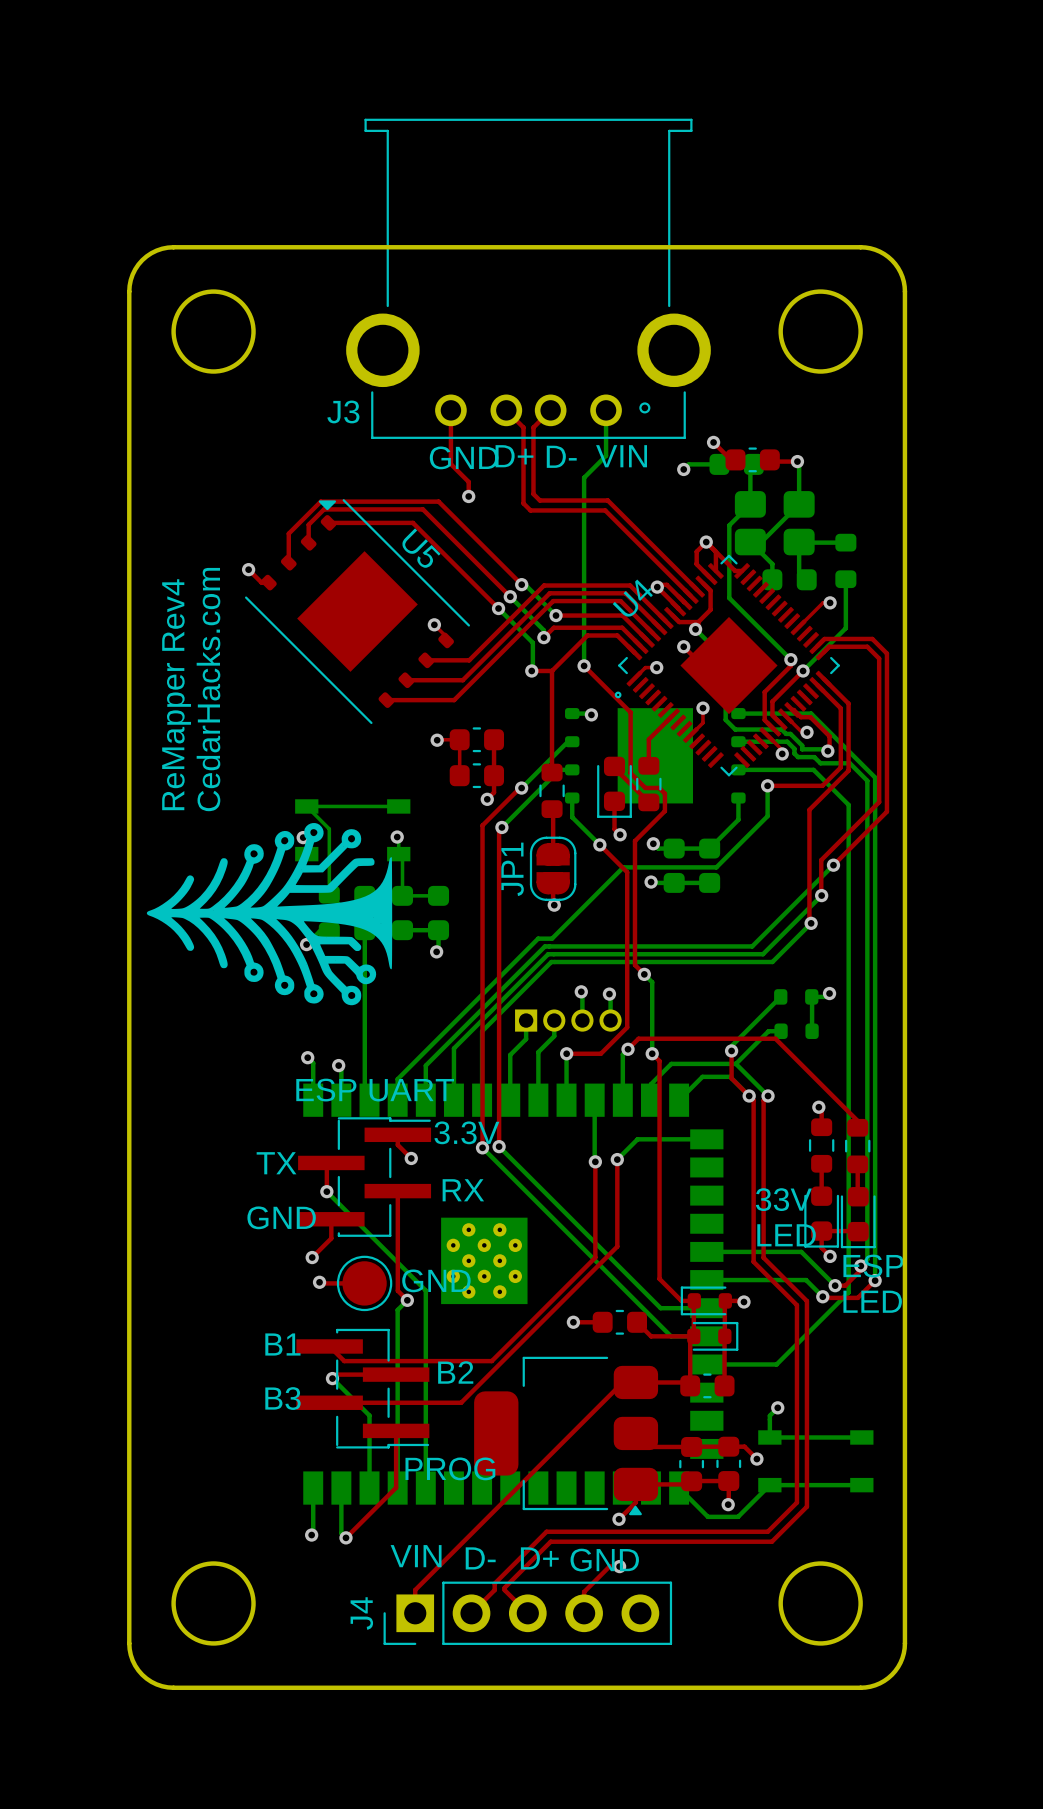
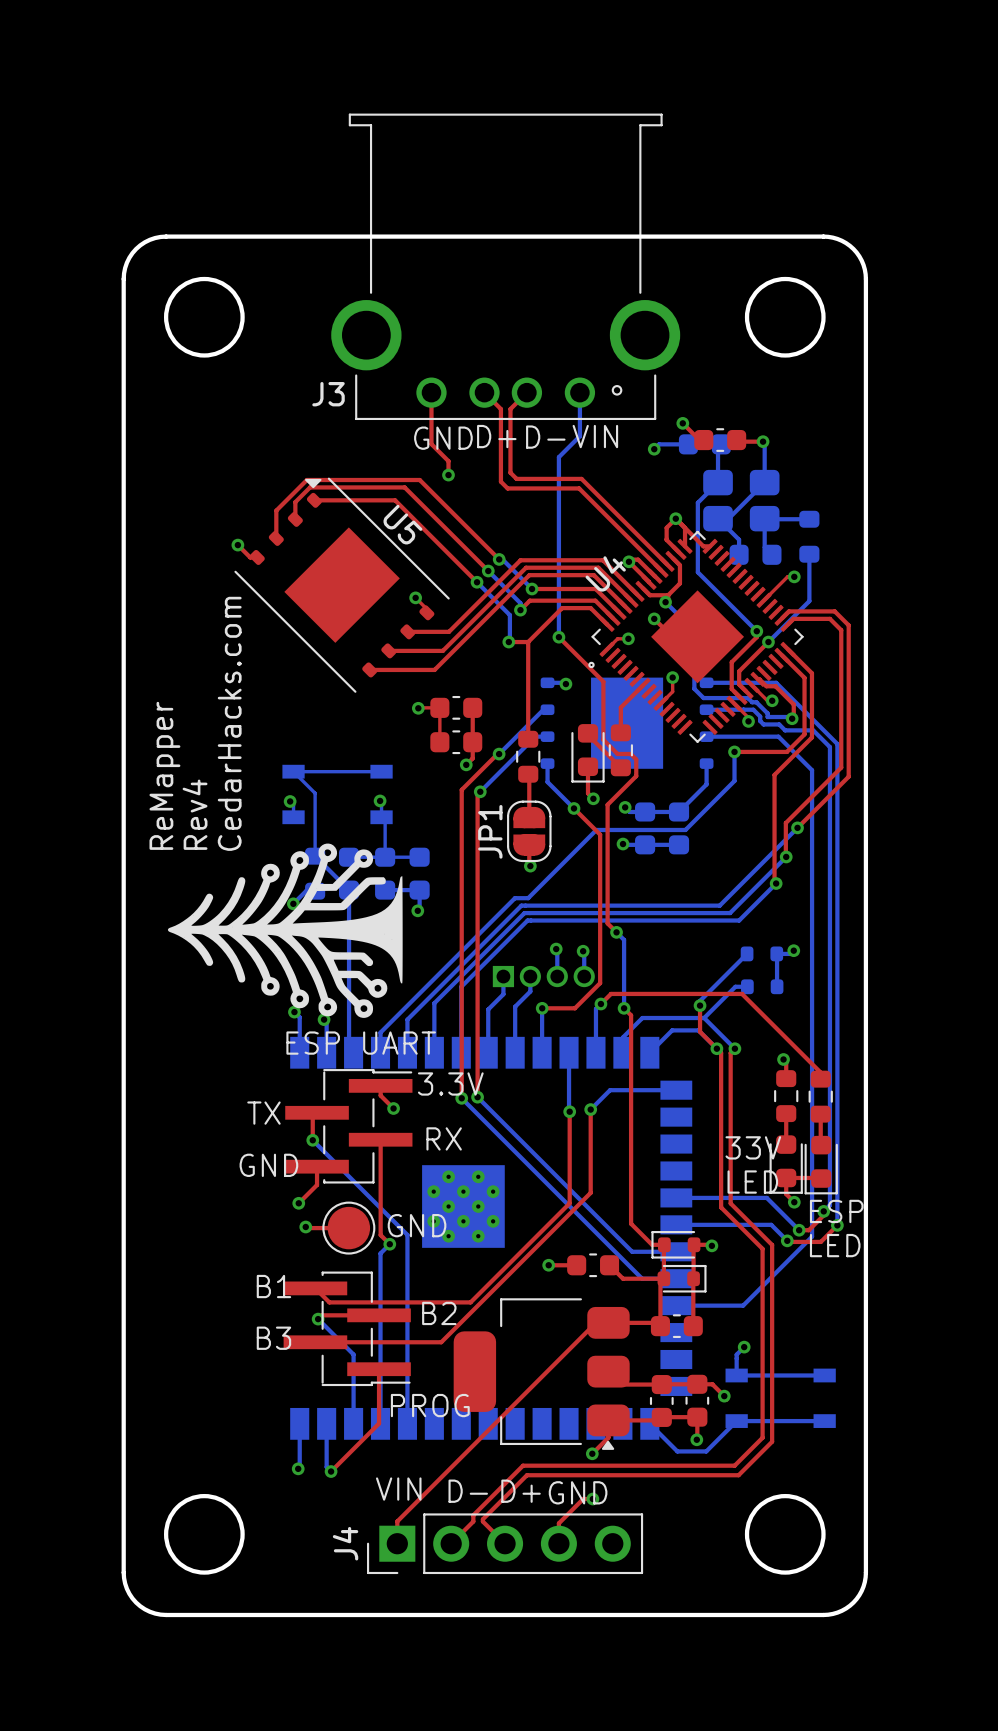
text position: CedarHacks.com (208, 689) -> CedarHacks.com (229, 723)
text: ReMapper Rev4 (176, 694) -> ReMapper (164, 775)
text: none -> Rev4 (195, 814)
drawing position: (269, 914) -> (285, 930)

